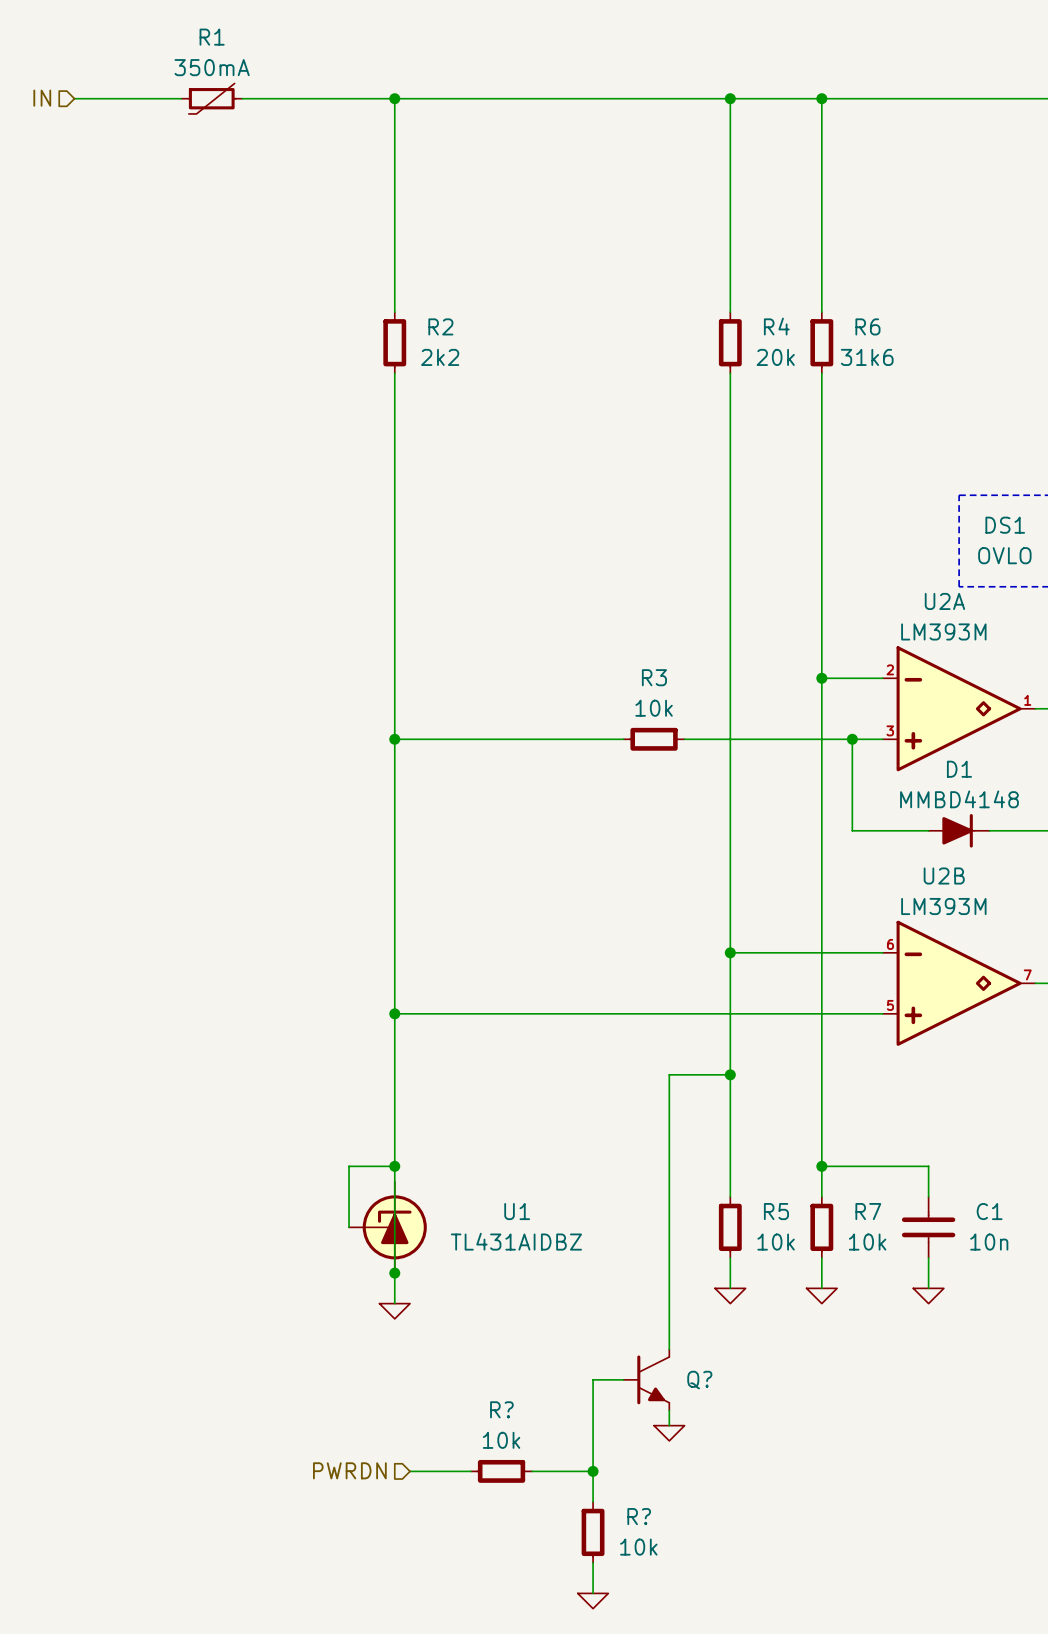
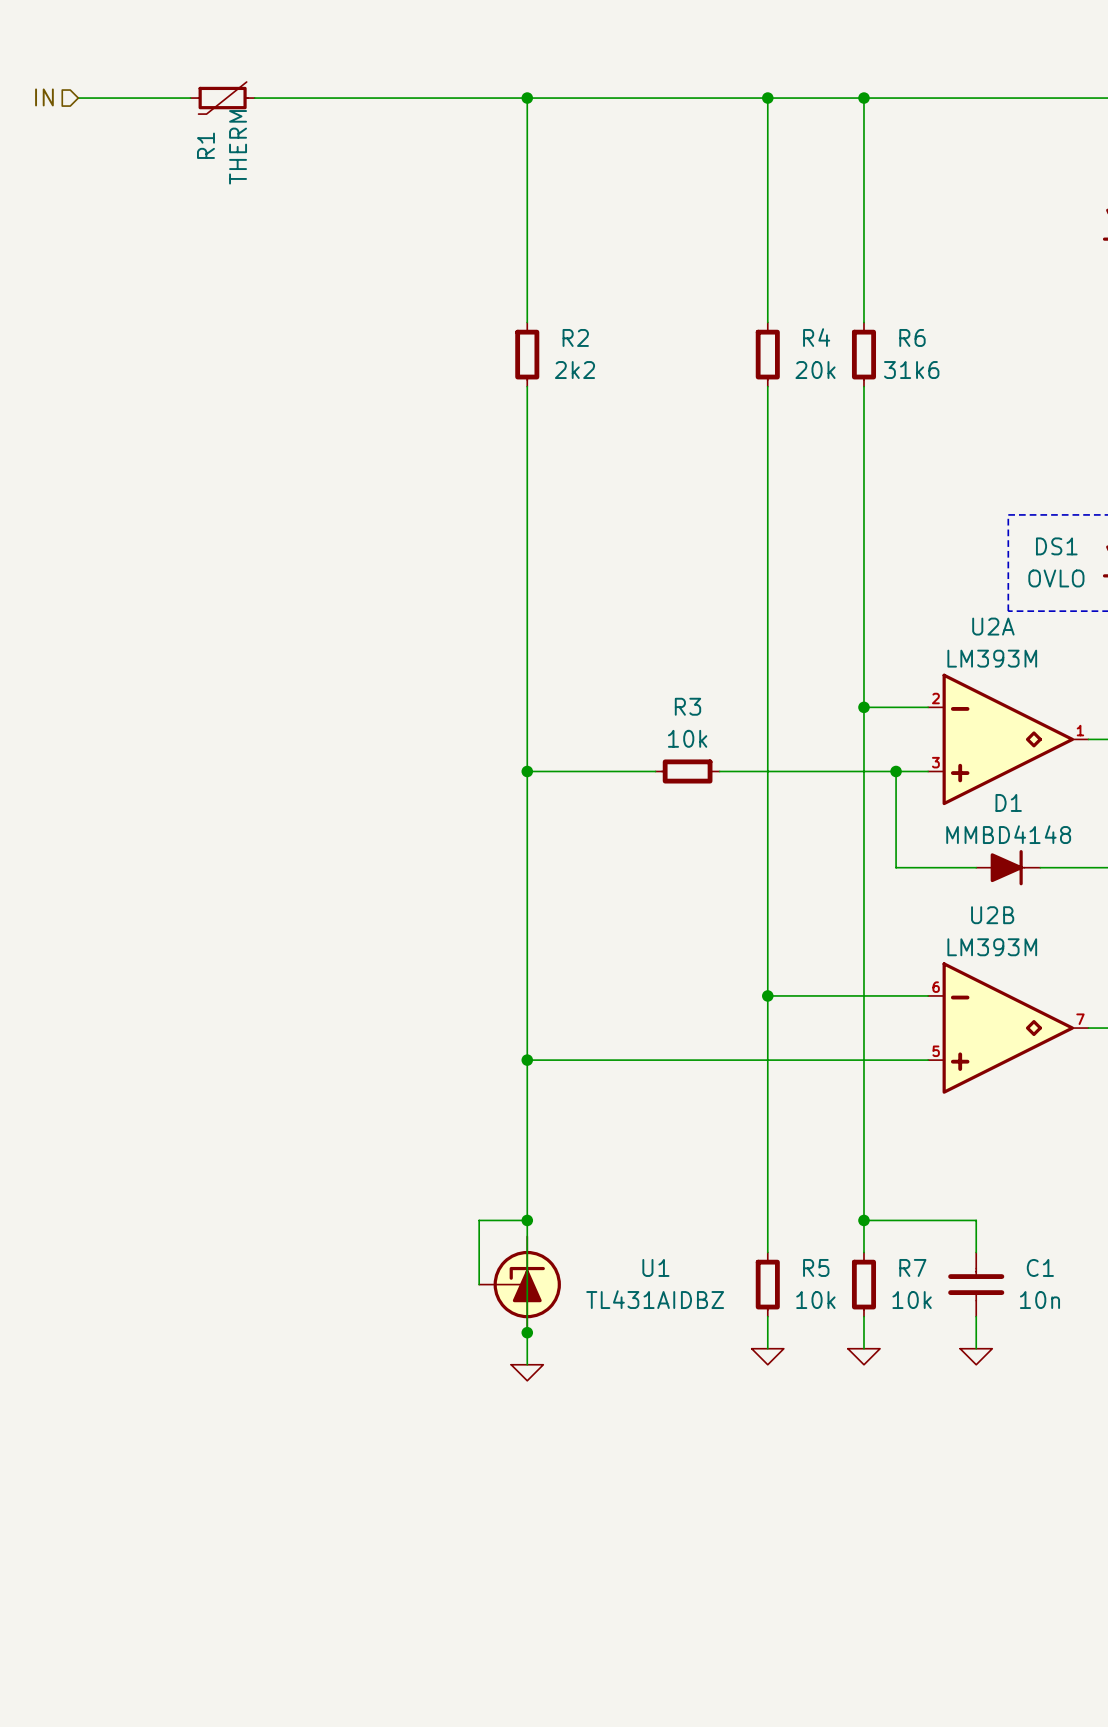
R1 name rotation: 0° (212, 37) -> 90° counterclockwise (205, 145)
R1 name position: R1 (212, 37) -> R1 (205, 145)
R1 value: 350mA (212, 67) -> THERM (238, 147)
wire: (394, 98) (394, 312) -> (527, 98) (527, 322)
junction: (394, 98) -> none
junction: none -> (527, 98)
R2 position: (394, 342) -> (527, 354)
wire: (394, 373) (394, 1303) -> (527, 386) (527, 1364)
wire: (394, 739) (501, 739) -> none
junction: (394, 739) -> none
junction: none -> (527, 771)
wire: (394, 1013) (501, 1013) -> none
junction: (394, 1013) -> none
junction: none -> (527, 1060)
wire: (730, 1074) (669, 1074) (669, 1349) -> none
junction: (730, 1074) -> none
wire: (394, 1166) (349, 1166) (349, 1227) -> (527, 1220) (479, 1220) (479, 1284)
junction: (394, 1166) -> none
junction: none -> (527, 1220)
U1 position: (387, 1227) -> (520, 1284)
junction: (394, 1273) -> none
junction: none -> (527, 1332)
power symbol: (394, 1311) -> none
power symbol: none -> (527, 1372)
wire: (623, 1379) (593, 1379) (593, 1501) -> none
Q?: (646, 1379) -> none
wire: (669, 1410) (669, 1425) -> none
power symbol: (669, 1433) -> none
hierarchical label: PWRDN (349, 1470) -> none
wire: (410, 1471) (471, 1471) -> none
R?: 10k (501, 1471) -> none
wire: (532, 1471) (593, 1471) -> none
junction: (593, 1471) -> none
R?: 10k (593, 1532) -> none
wire: (593, 1562) (593, 1593) -> none
power symbol: (593, 1601) -> none

